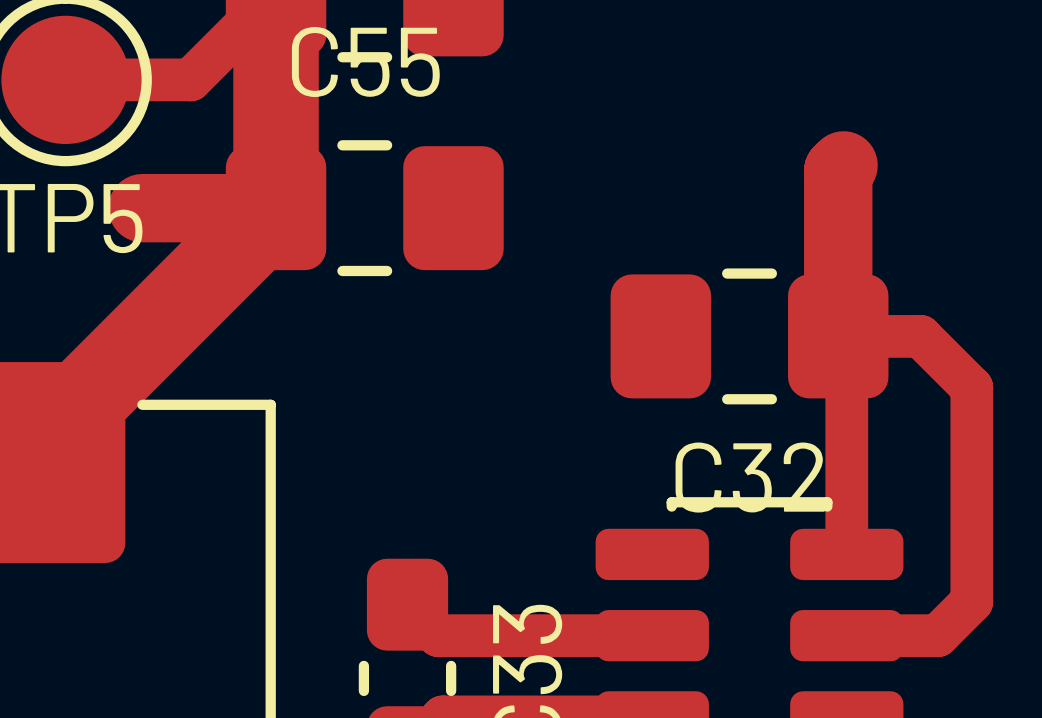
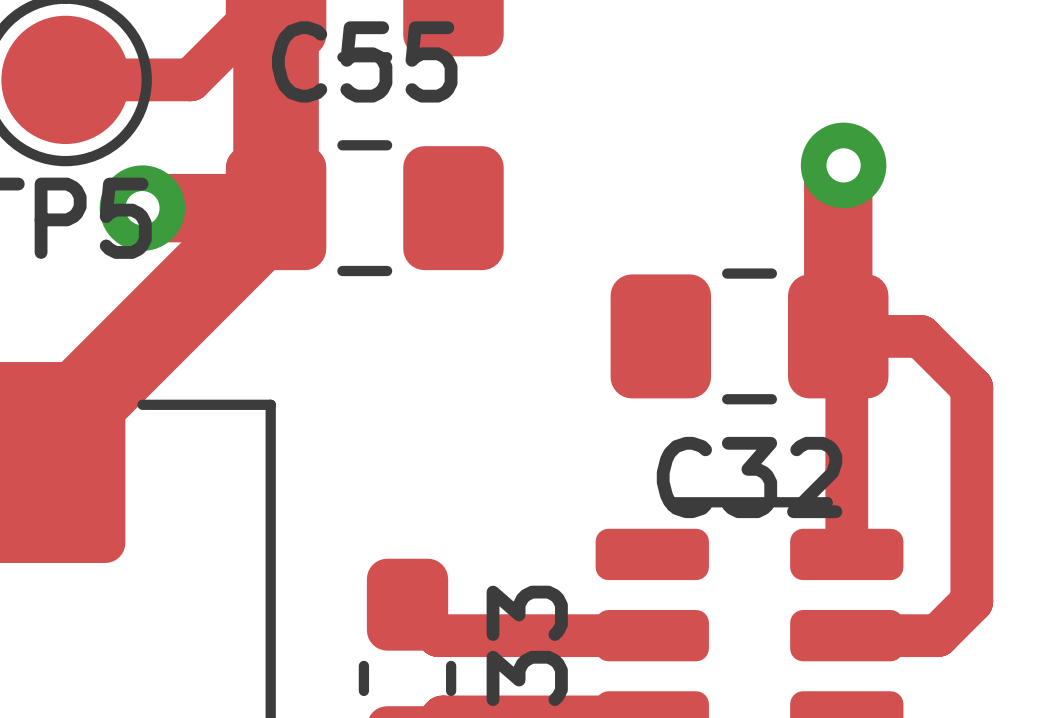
via: none -> (843, 165)
via: none -> (142, 208)

